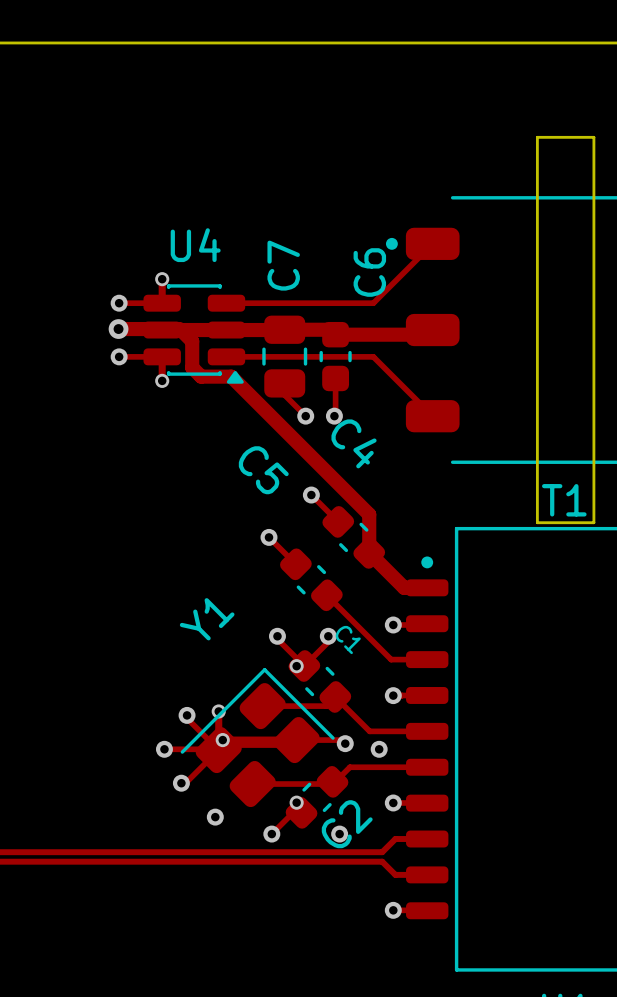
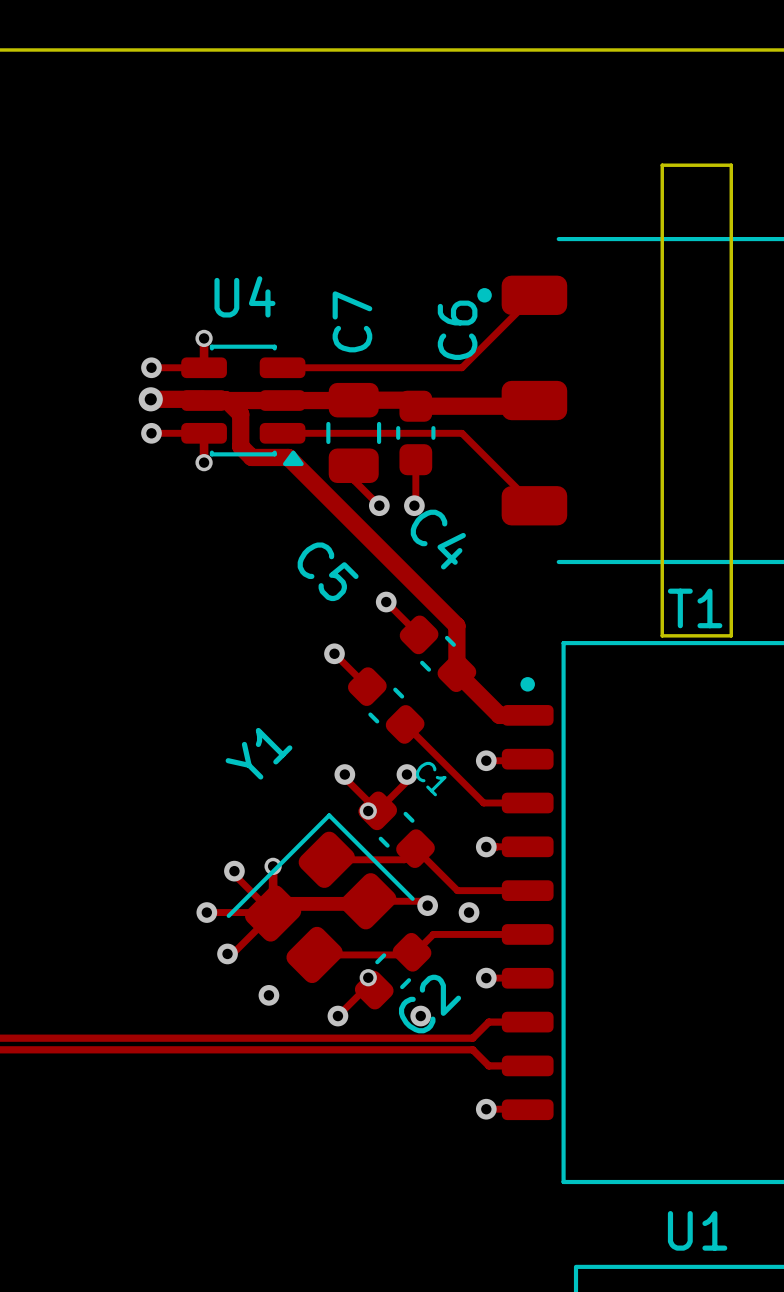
via: (222, 740) -> none

